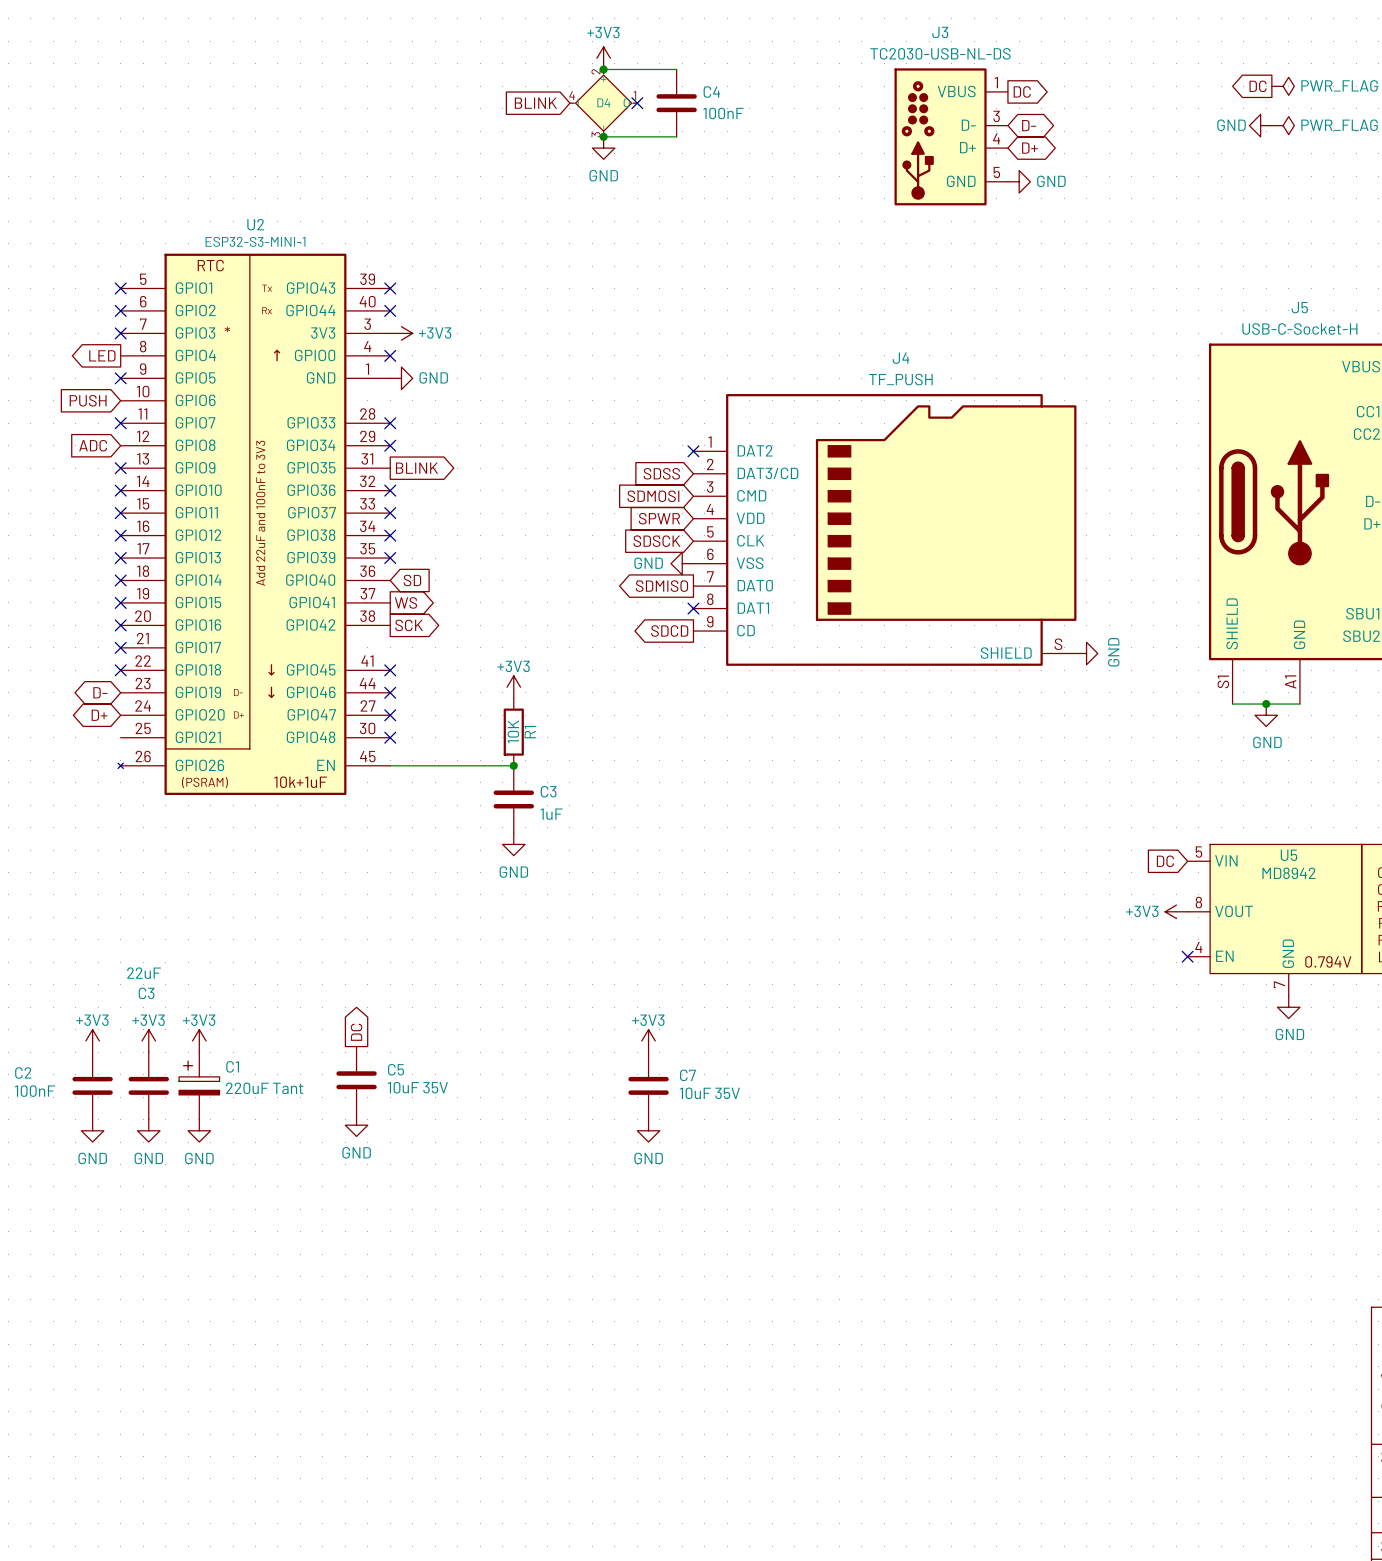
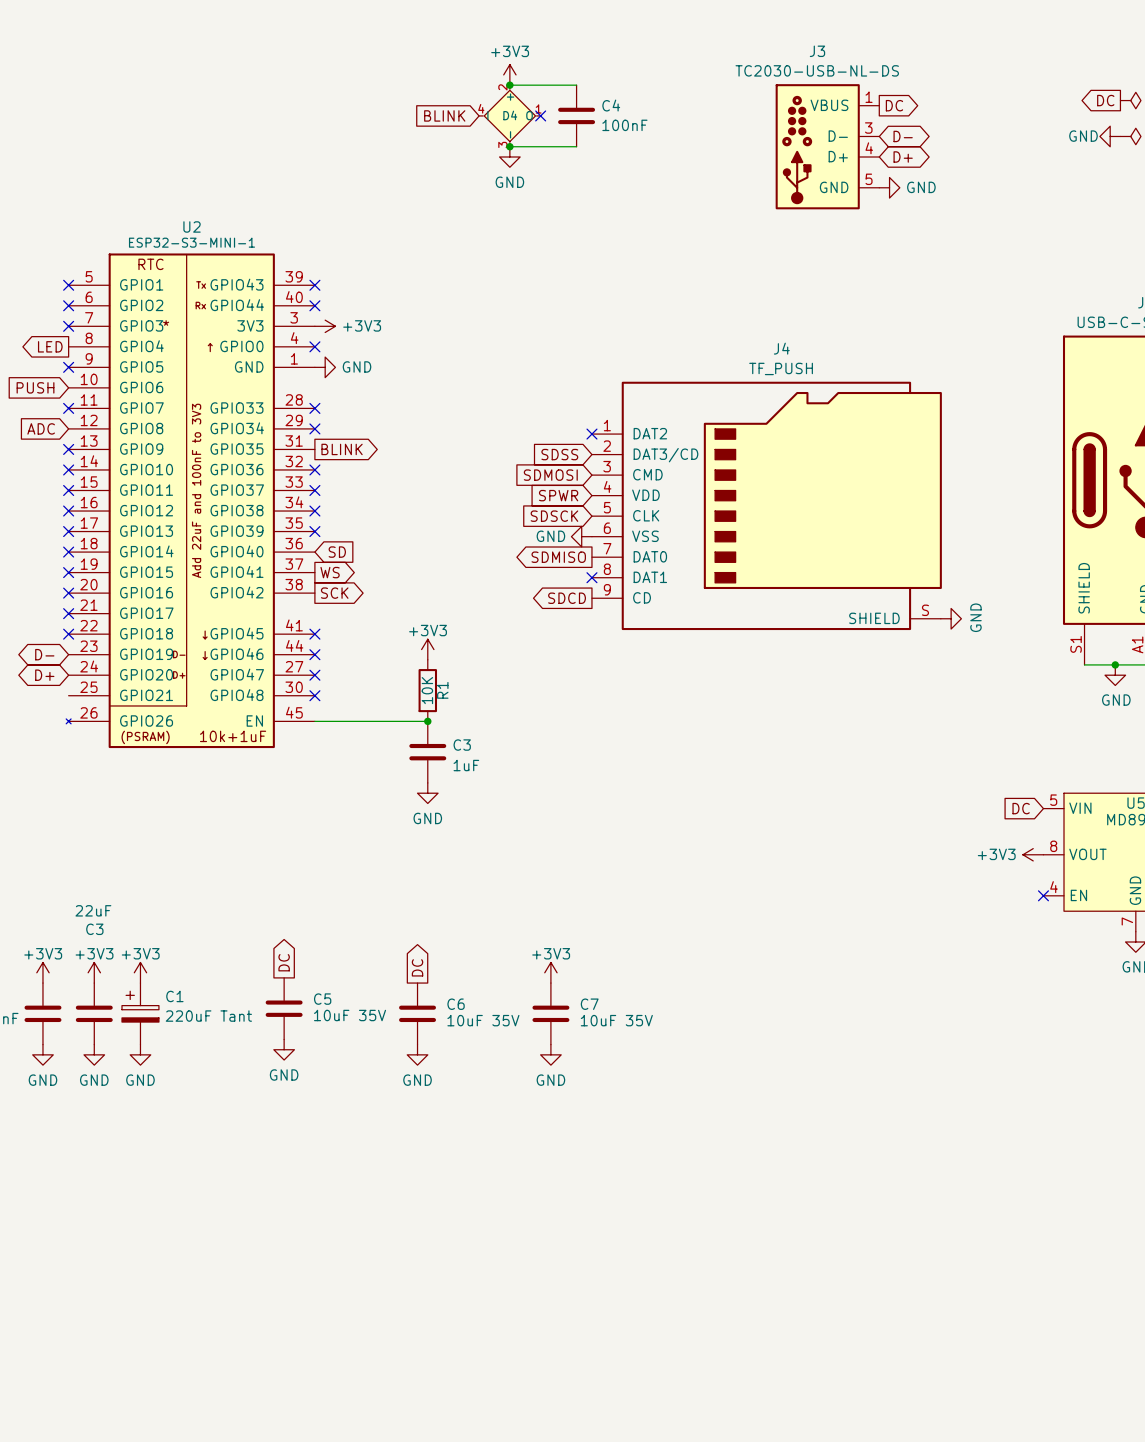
global label: none -> DC (417, 967)
C6: none -> 10uF 35V (417, 1013)
power symbol: none -> GND (417, 1054)

